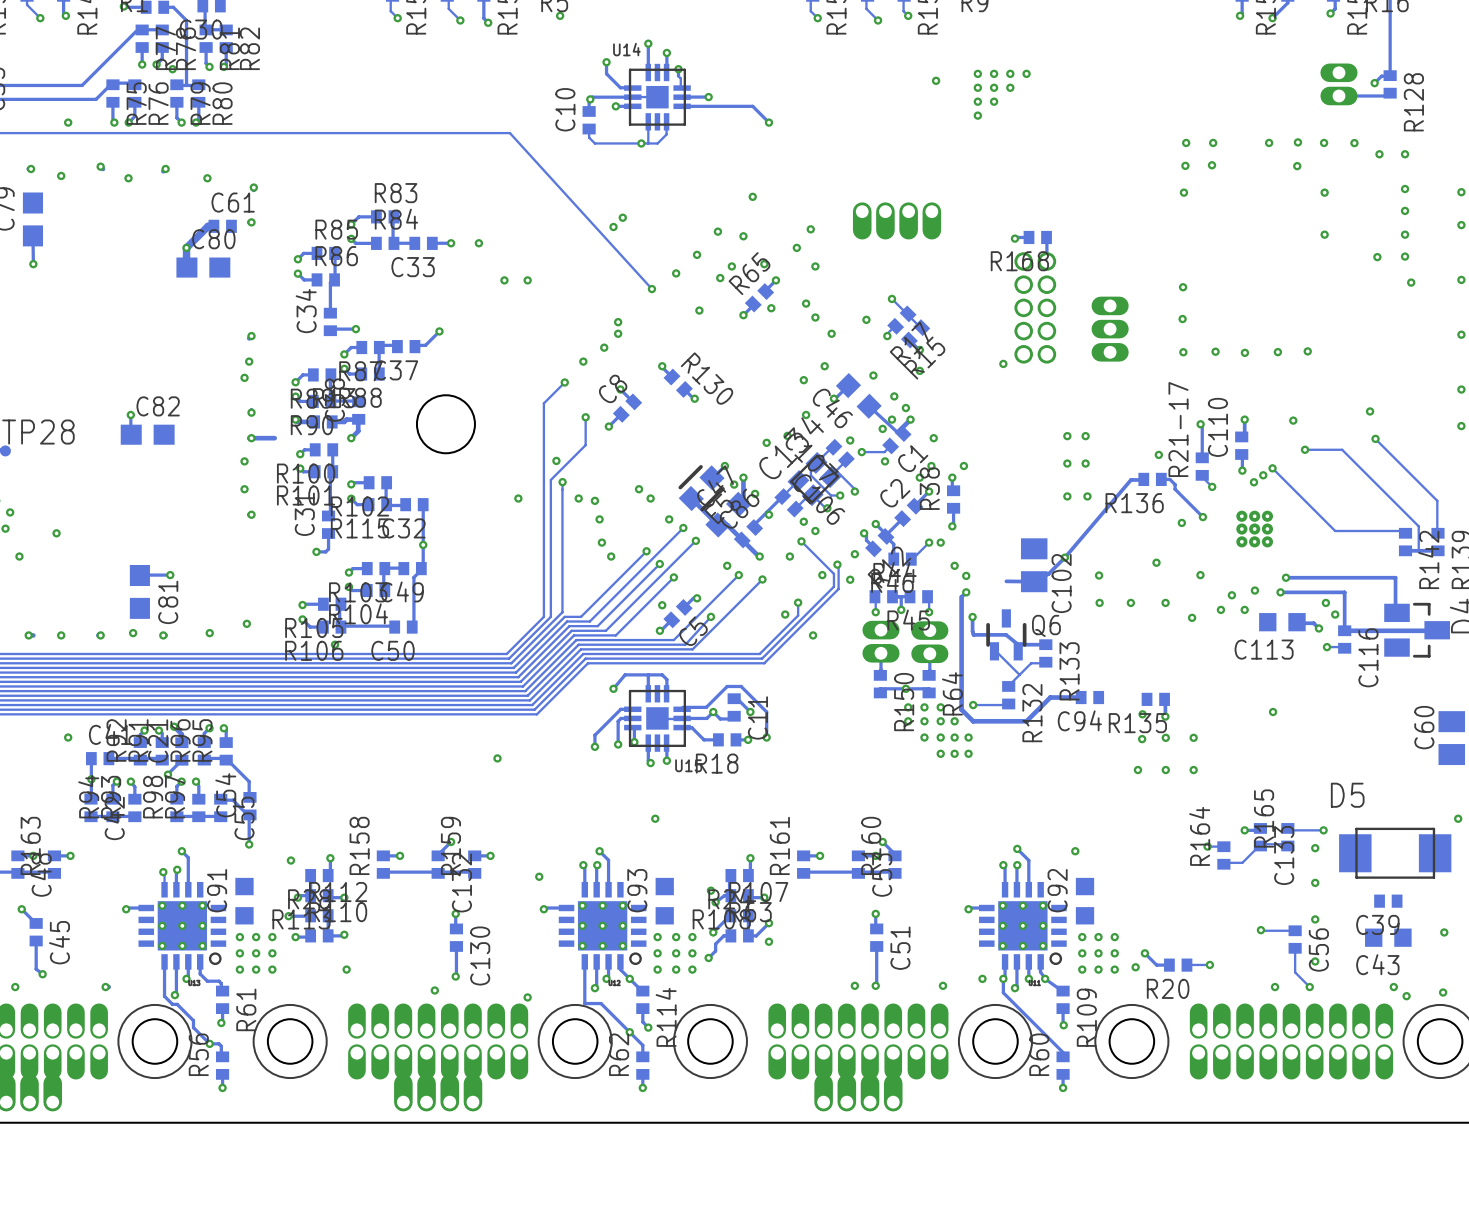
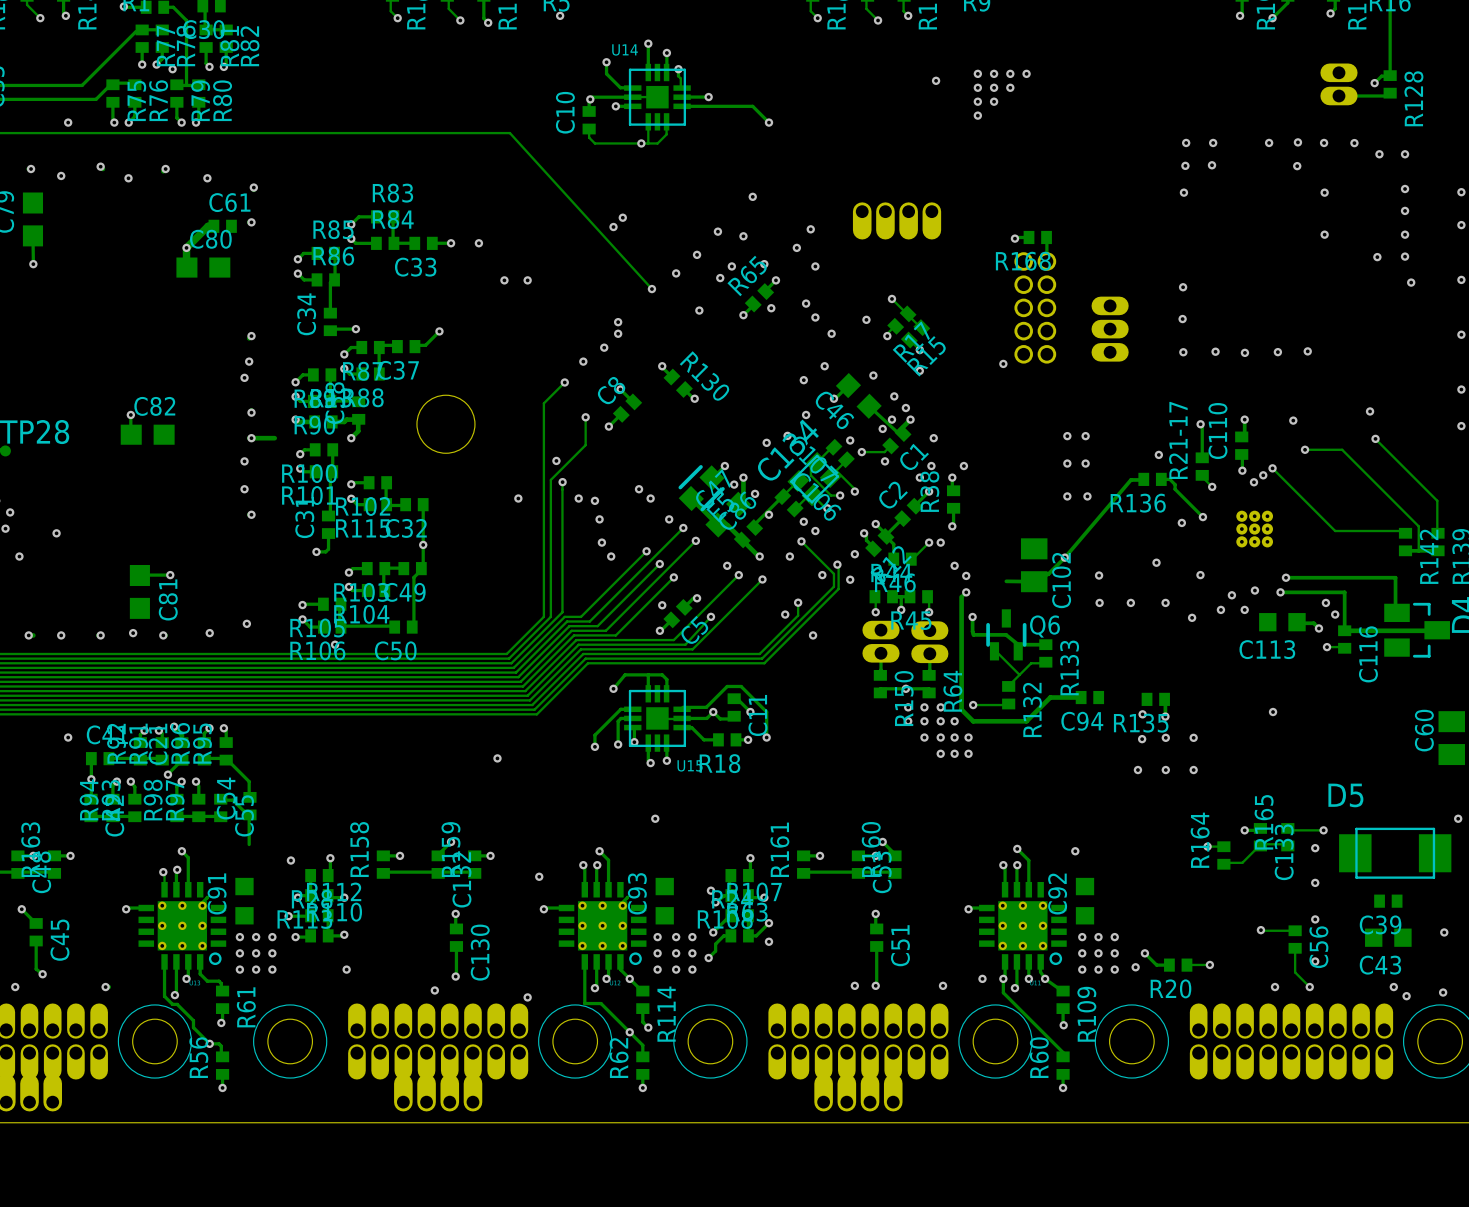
via: (249, 844) -> none
track: none -> (207, 897) (200, 904) (202, 905)
track: none -> (627, 897) (620, 904)

